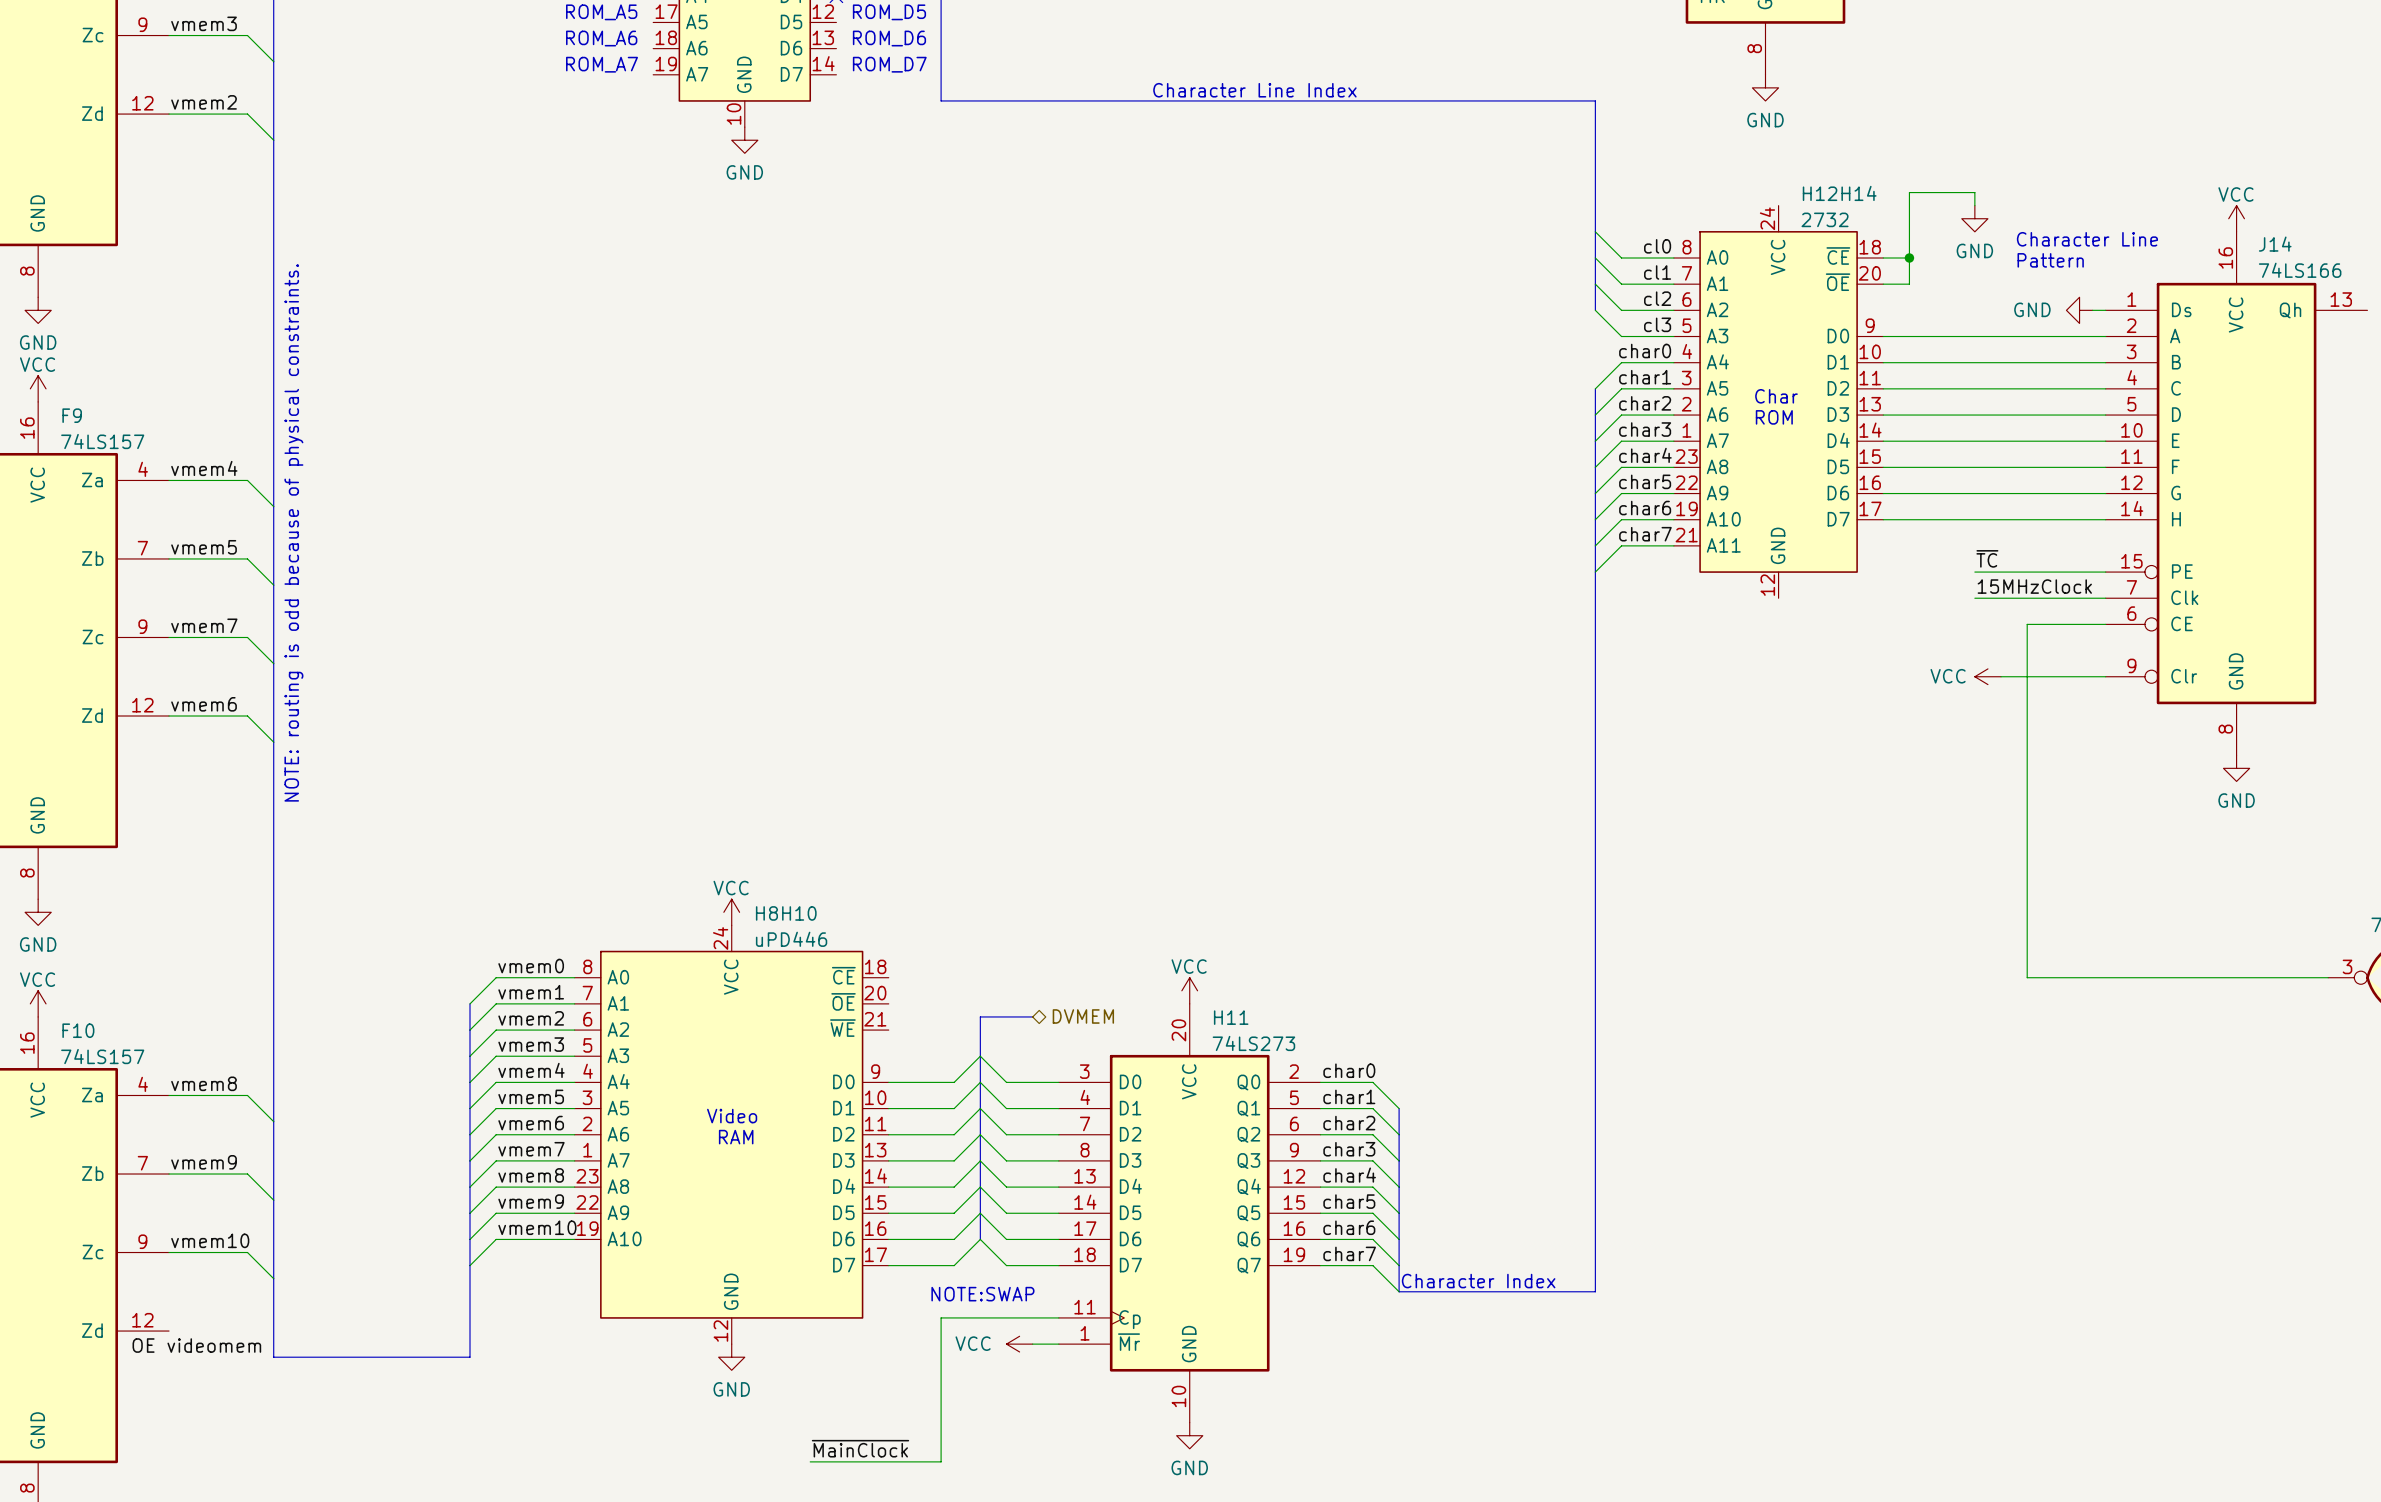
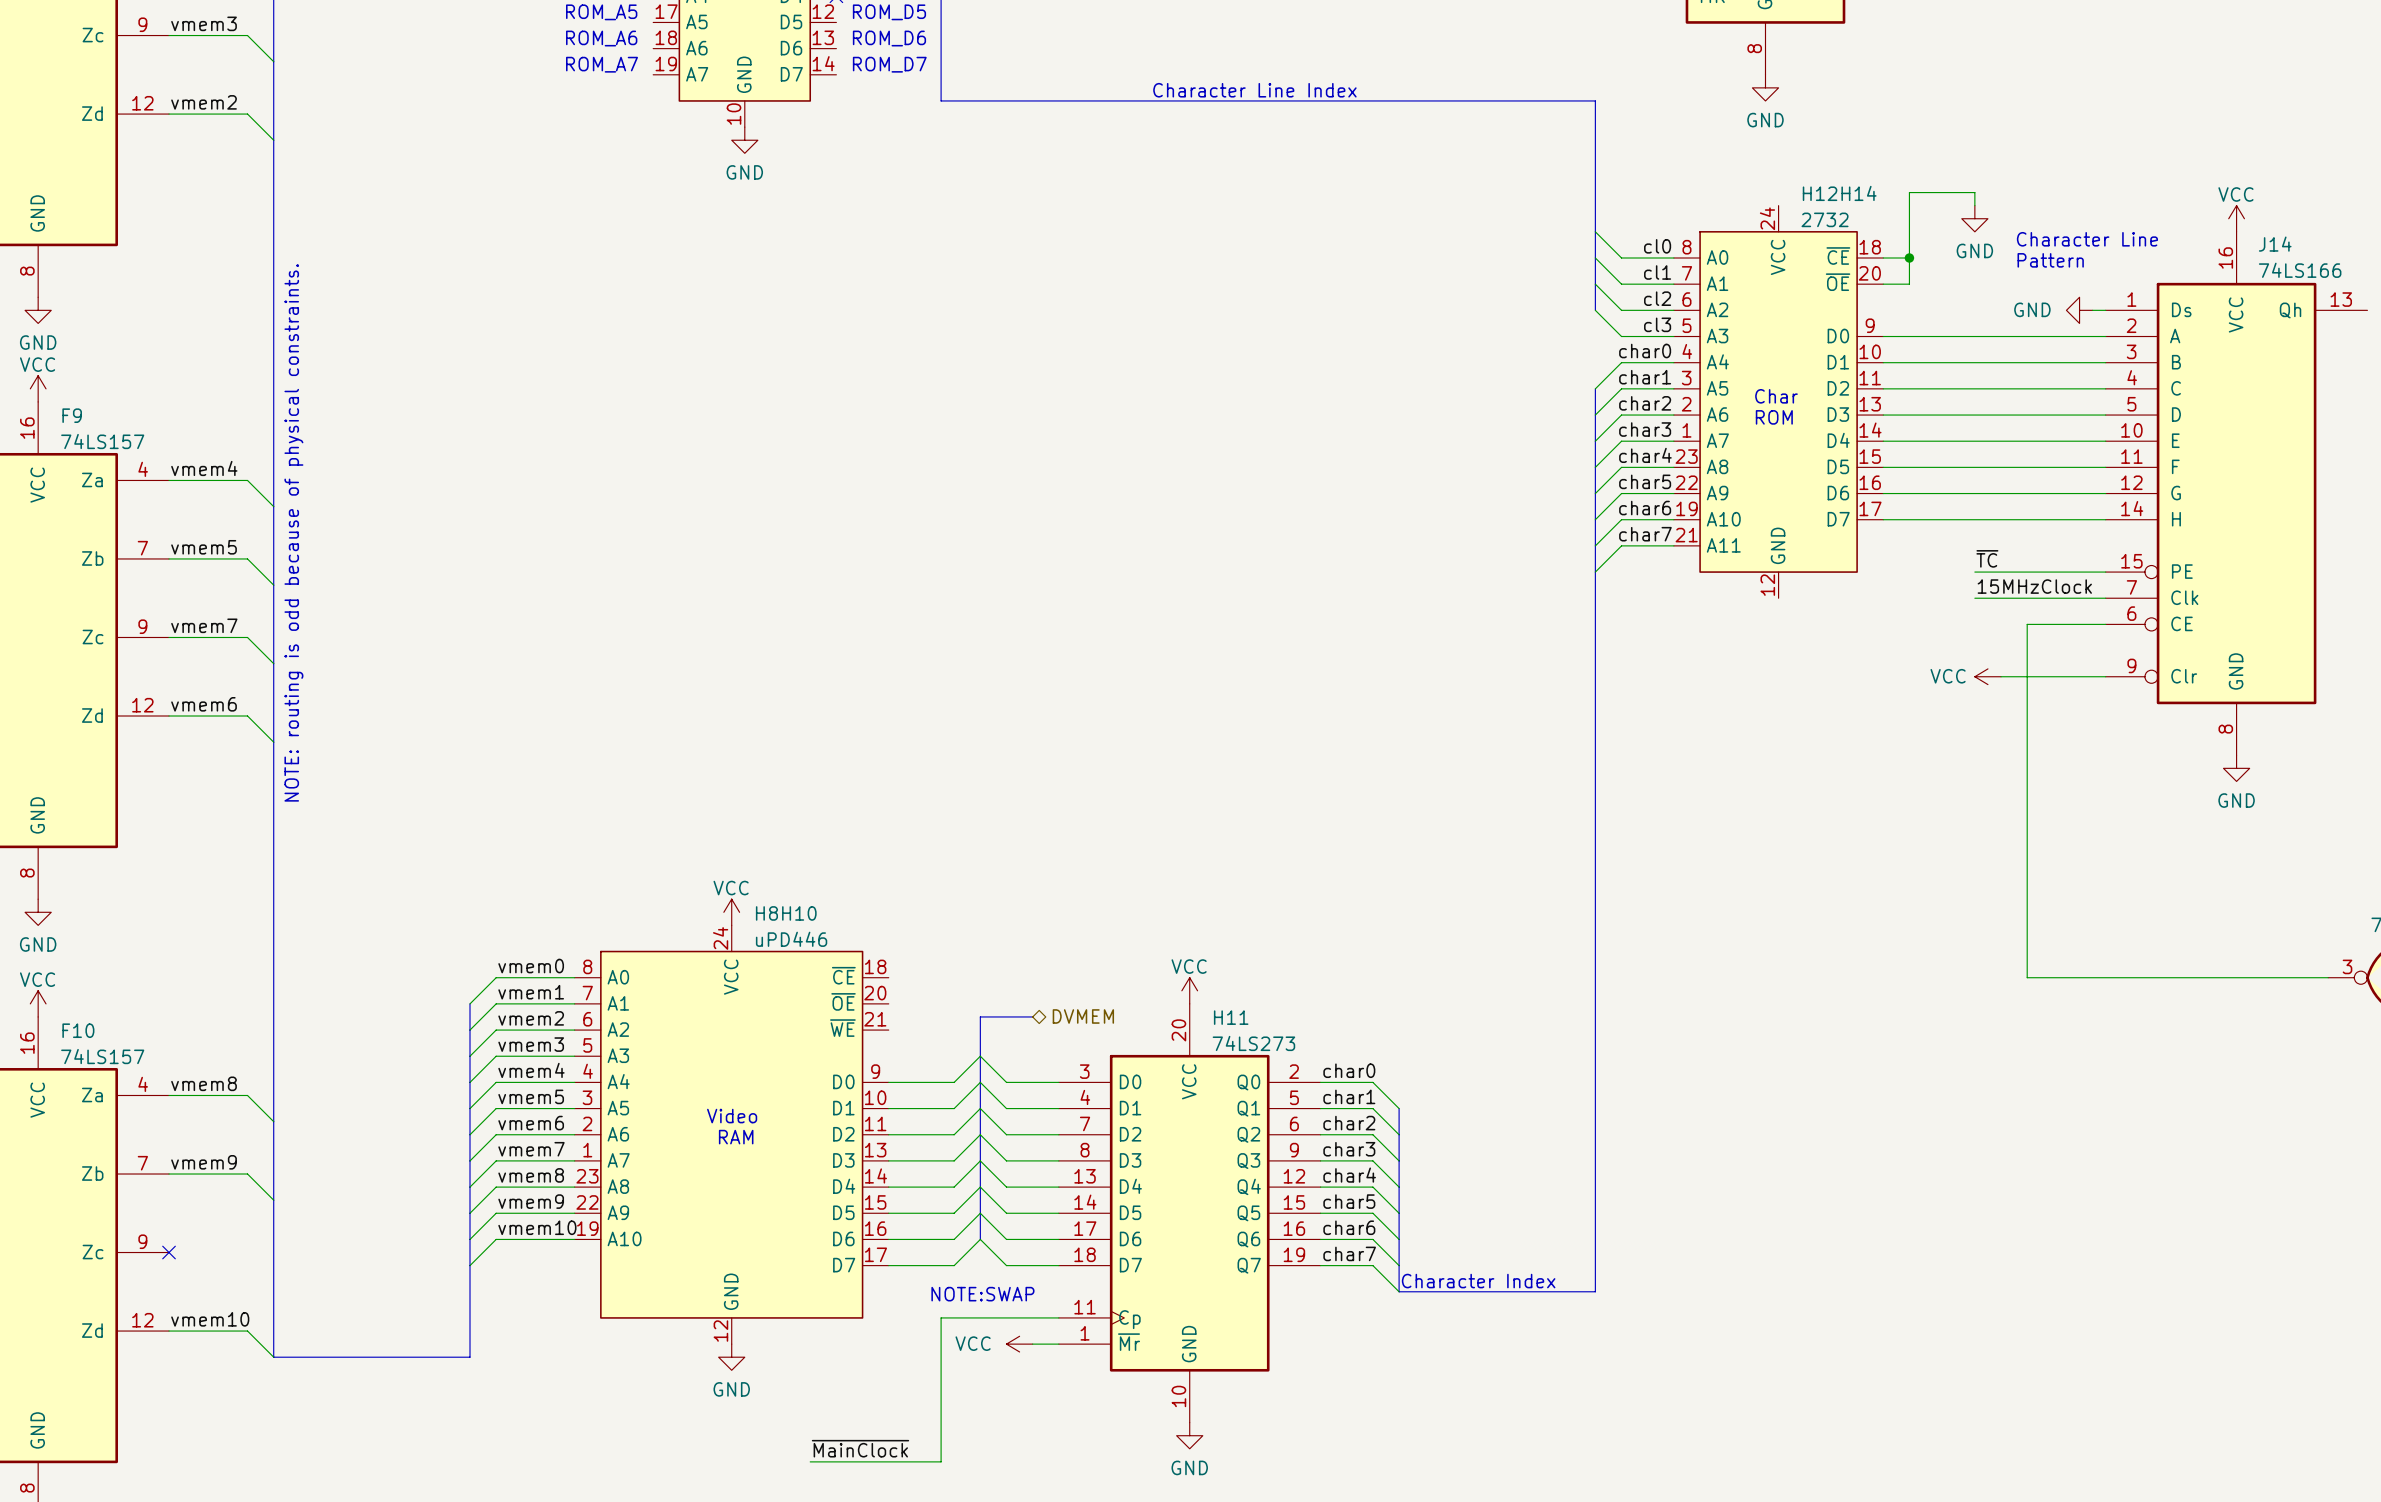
label position: vmem10 (210, 1240) -> vmem10 (210, 1319)
wire: (169, 1252) (247, 1252) (273, 1278) -> (169, 1331) (247, 1331) (273, 1357)
no-connect mark: none -> (169, 1252)
label: OE videomem (196, 1345) -> none

